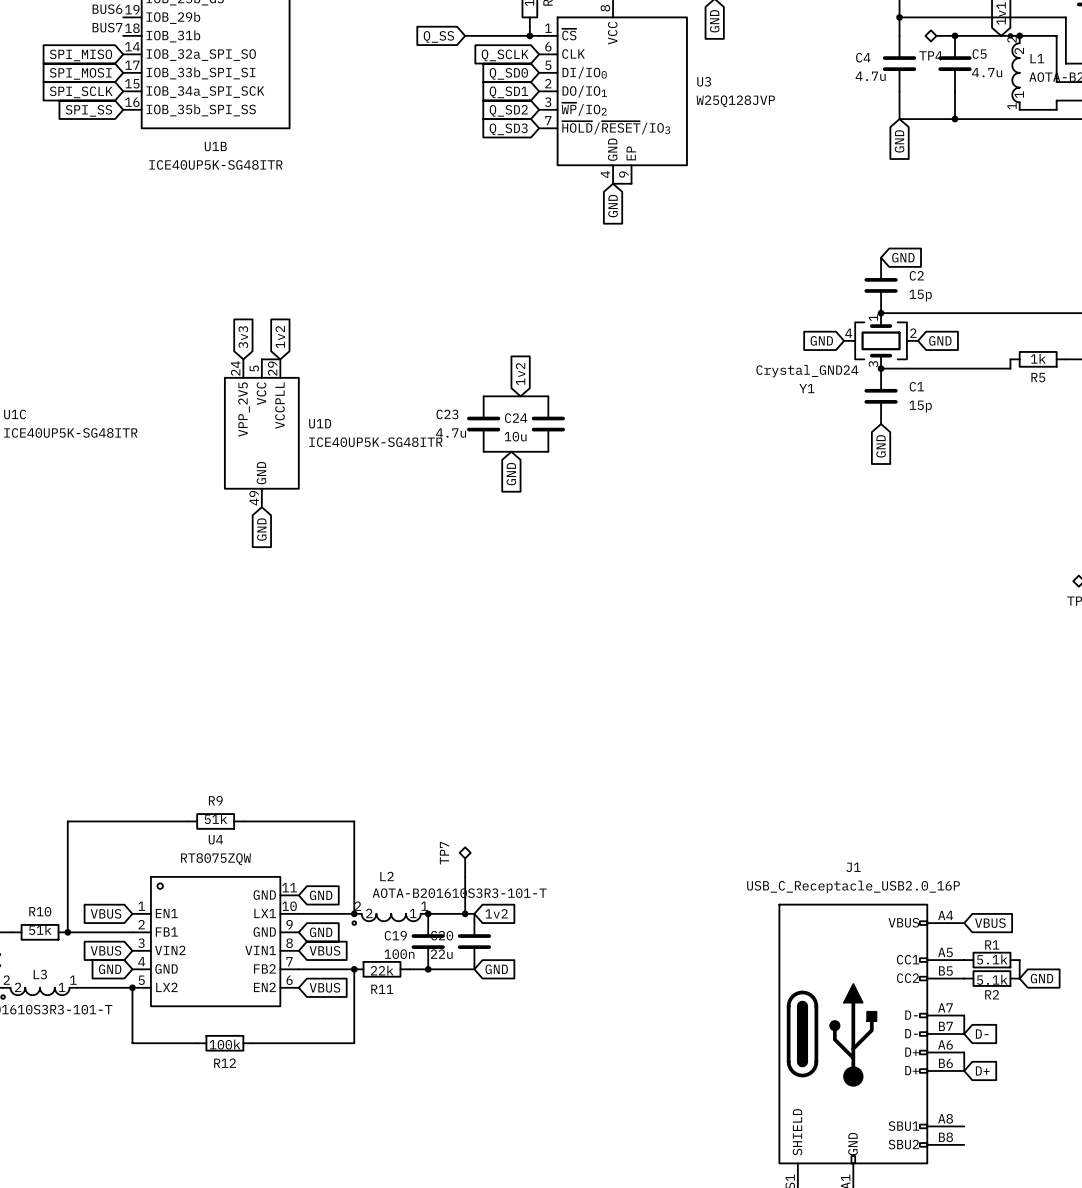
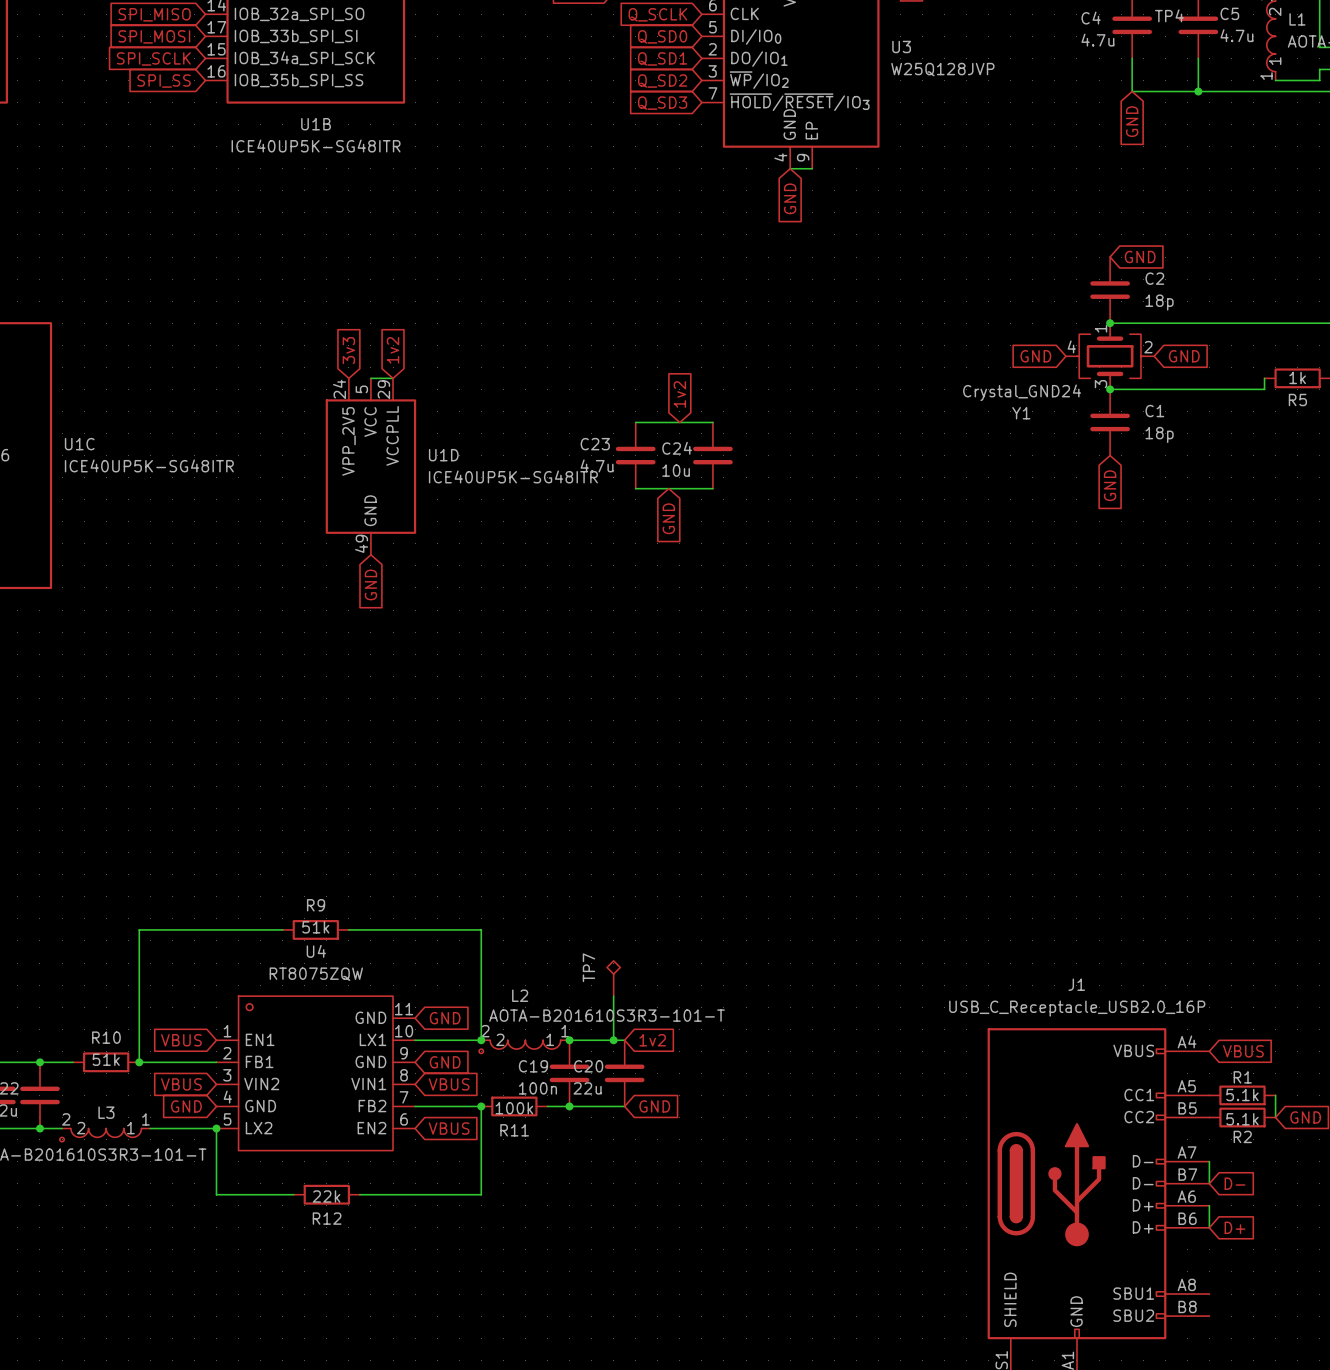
C2 value: 15p (920, 295) -> 18p (1159, 302)
C1 value: 15p (920, 406) -> 18p (1159, 434)
R11 value: 22k (382, 970) -> 100k (514, 1108)
R12 value: 100k (225, 1044) -> 22k (326, 1196)

